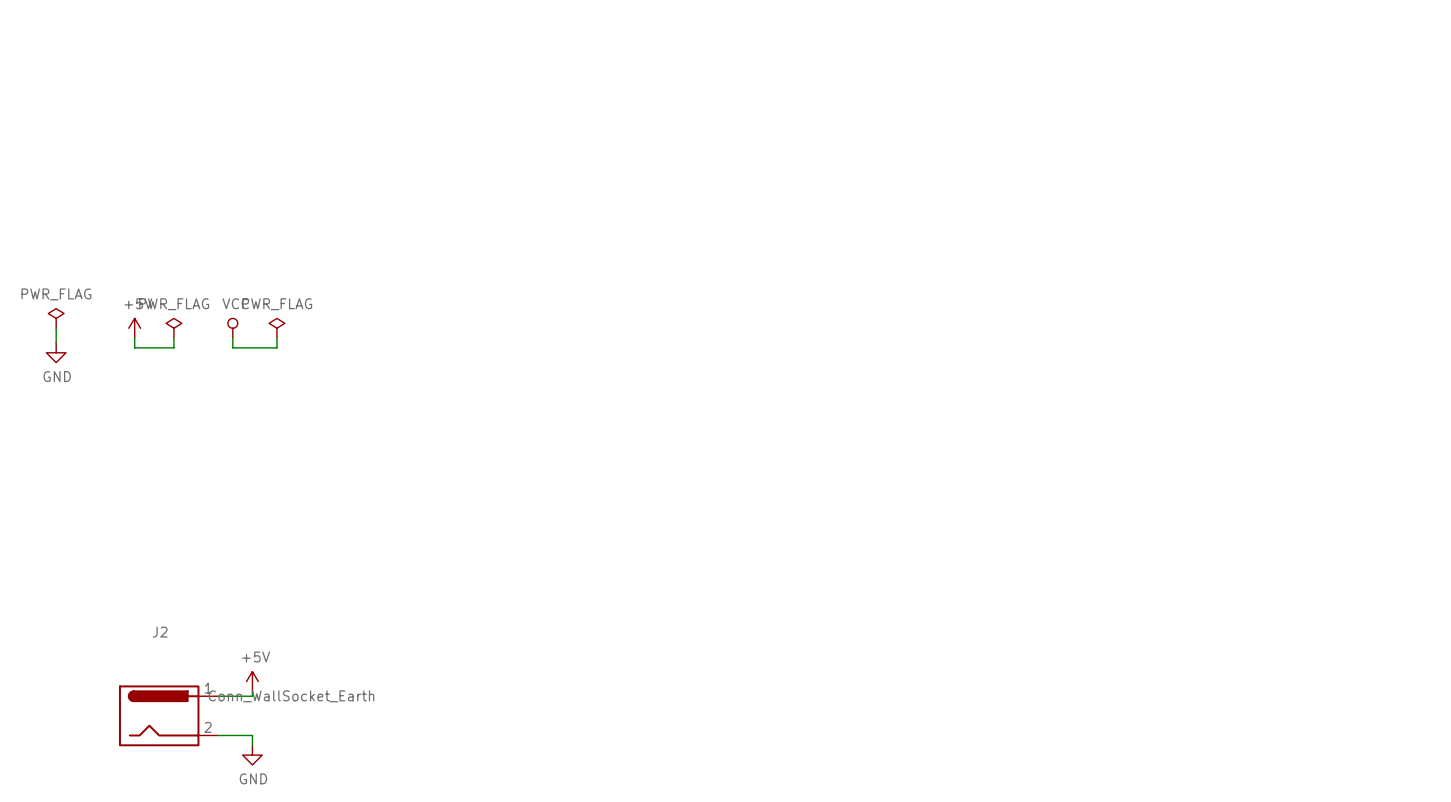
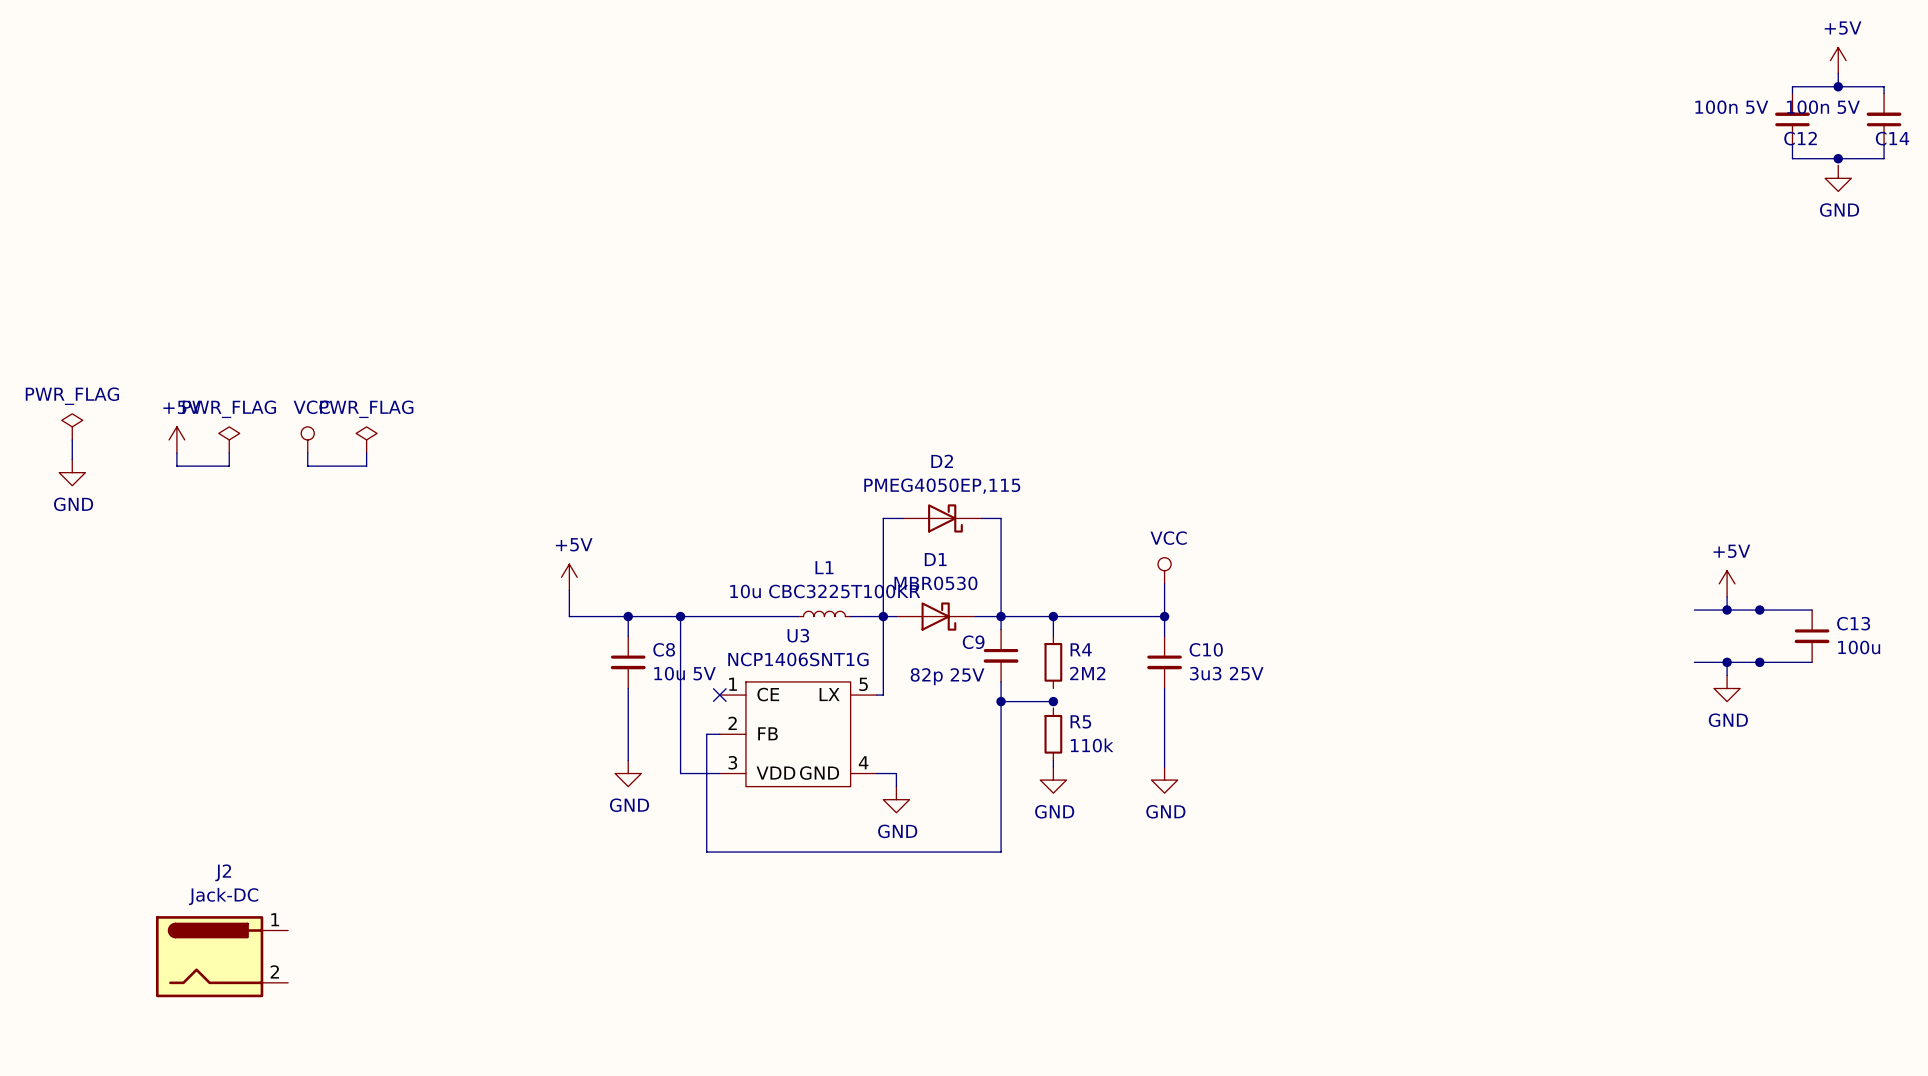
power symbol: none -> +5V (1838, 60)
wire: none -> (1838, 73) (1838, 86)
junction: none -> (1838, 86)
wire: none -> (1792, 93) (1792, 86) (1884, 86) (1884, 93)
C12: none -> 100n 5V (1792, 119)
C14: none -> 100n 5V (1884, 119)
wire: none -> (1792, 145) (1792, 158) (1884, 158) (1884, 145)
junction: none -> (1838, 158)
power symbol: none -> GND (1838, 178)
wire: none -> (902, 518) (883, 518) (883, 695) (876, 695)
D2: none -> PMEG4050EP,115 (942, 518)
wire: none -> (981, 518) (1001, 518) (1001, 629)
power symbol: none -> VCC (1164, 570)
power symbol: none -> +5V (569, 577)
wire: none -> (1164, 583) (1164, 636)
power symbol: none -> +5V (1727, 583)
wire: none -> (569, 590) (569, 616) (798, 616)
wire: none -> (1727, 596) (1727, 610)
wire: none -> (1694, 610) (1812, 610)
junction: none -> (1727, 610)
junction: none -> (1759, 610)
L1: none -> 10u CBC3225T100KR (824, 613)
wire: none -> (628, 616) (628, 636)
junction: none -> (628, 616)
wire: none -> (680, 616) (680, 773) (719, 773)
junction: none -> (680, 616)
wire: none -> (850, 616) (896, 616)
junction: none -> (883, 616)
D1: none -> MBR0530 (935, 616)
wire: none -> (974, 616) (1164, 616)
junction: none -> (1001, 616)
wire: none -> (1053, 616) (1053, 636)
junction: none -> (1053, 616)
junction: none -> (1164, 616)
C13: none -> 100u (1812, 636)
C9: none -> 82p 25V (1001, 655)
C8: none -> 10u 5V (628, 662)
R4: none -> 2M2 (1053, 662)
C10: none -> 3u3 25V (1164, 662)
wire: none -> (1694, 662) (1812, 662)
wire: none -> (1727, 662) (1727, 675)
junction: none -> (1727, 662)
junction: none -> (1759, 662)
wire: none -> (1001, 681) (1001, 852) (706, 852) (706, 734) (719, 734)
wire: none -> (628, 688) (628, 760)
wire: none -> (1164, 688) (1164, 766)
power symbol: none -> GND (1727, 688)
no-connect mark: none -> (719, 695)
wire: none -> (1001, 701) (1053, 701)
junction: none -> (1001, 701)
junction: none -> (1053, 701)
U3: none -> NCP1406SNT1G (798, 734)
R5: none -> 110k (1053, 734)
wire: none -> (1053, 760) (1053, 766)
power symbol: none -> GND (628, 773)
wire: none -> (876, 773) (896, 773) (896, 786)
power symbol: none -> GND (1053, 780)
power symbol: none -> GND (1164, 780)
power symbol: none -> GND (896, 799)
J2 name position: J2 (160, 632) -> J2 (223, 872)
power symbol: +5V (252, 681) -> none
wire: (252, 691) (252, 696) (218, 696) -> none
J2 value: Conn_WallSocket_Earth (291, 696) -> Jack-DC (223, 896)
wire: (218, 735) (252, 735) (252, 745) -> none
power symbol: GND (252, 755) -> none

